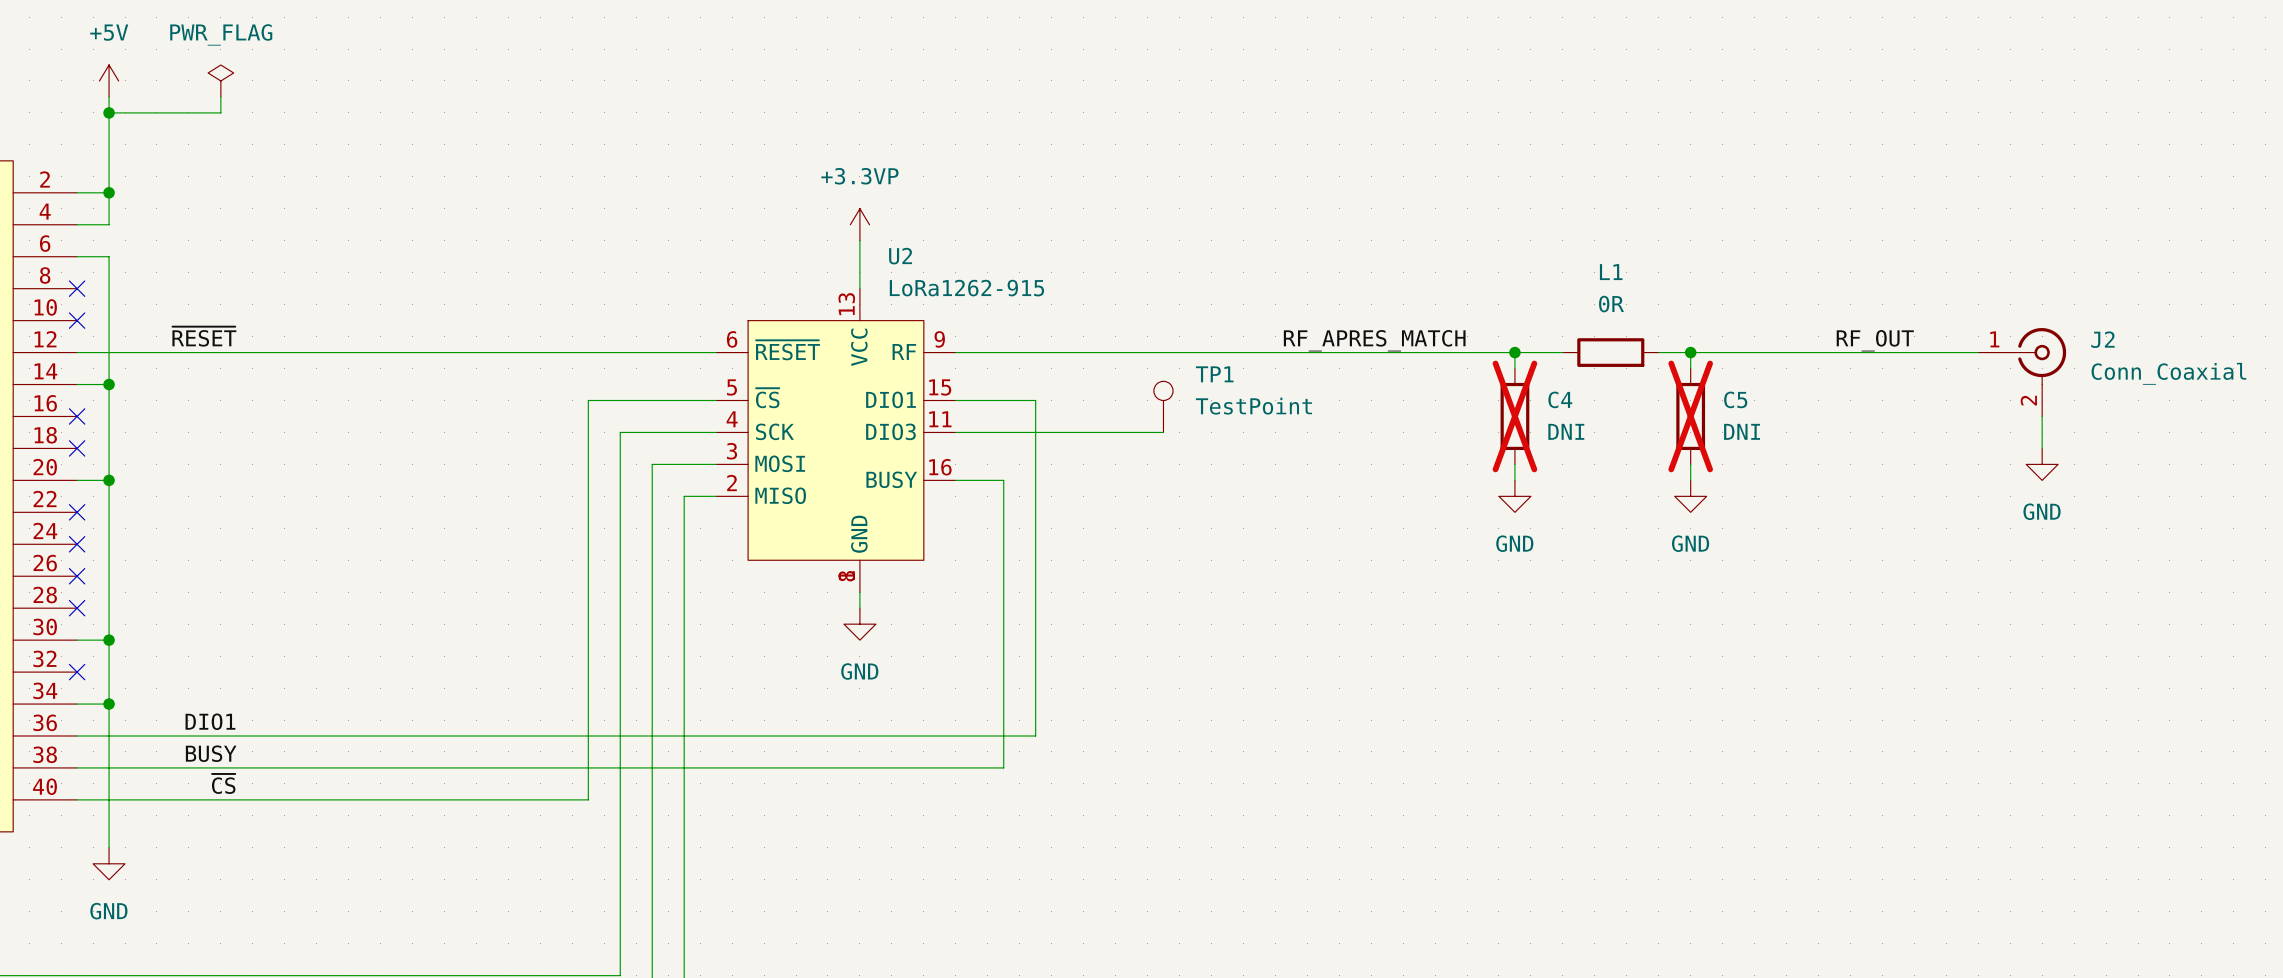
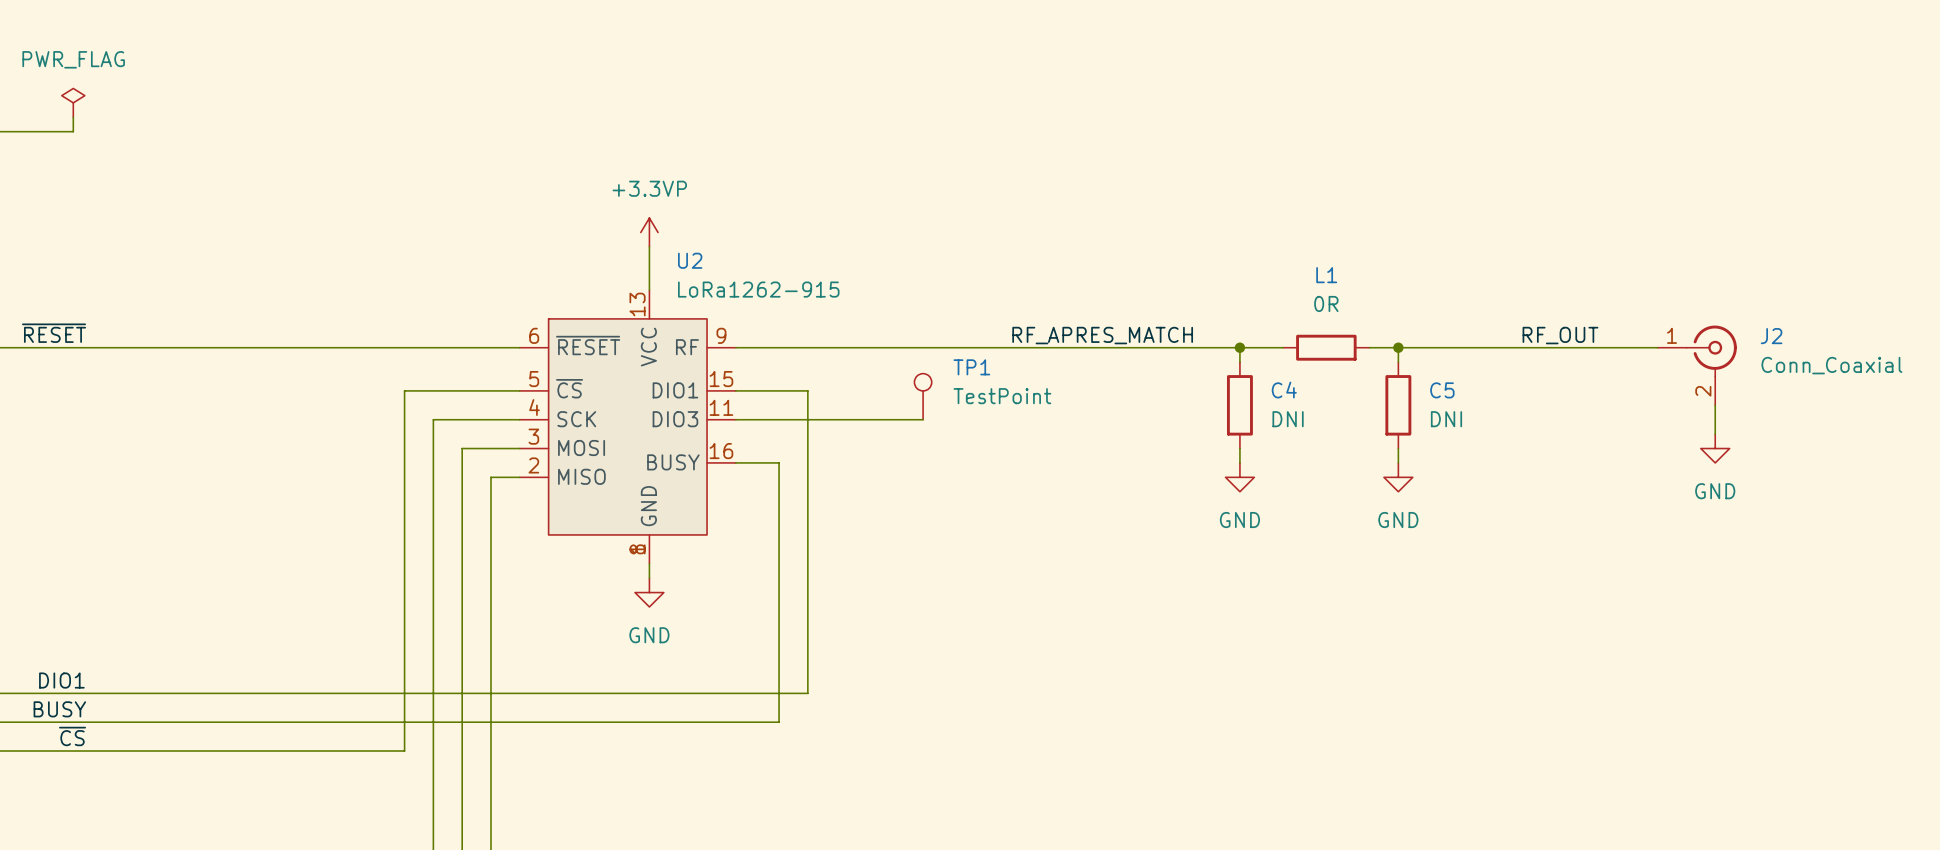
C4 do-not-place cross: (1514, 416) -> none
C5 do-not-place cross: (1690, 416) -> none

